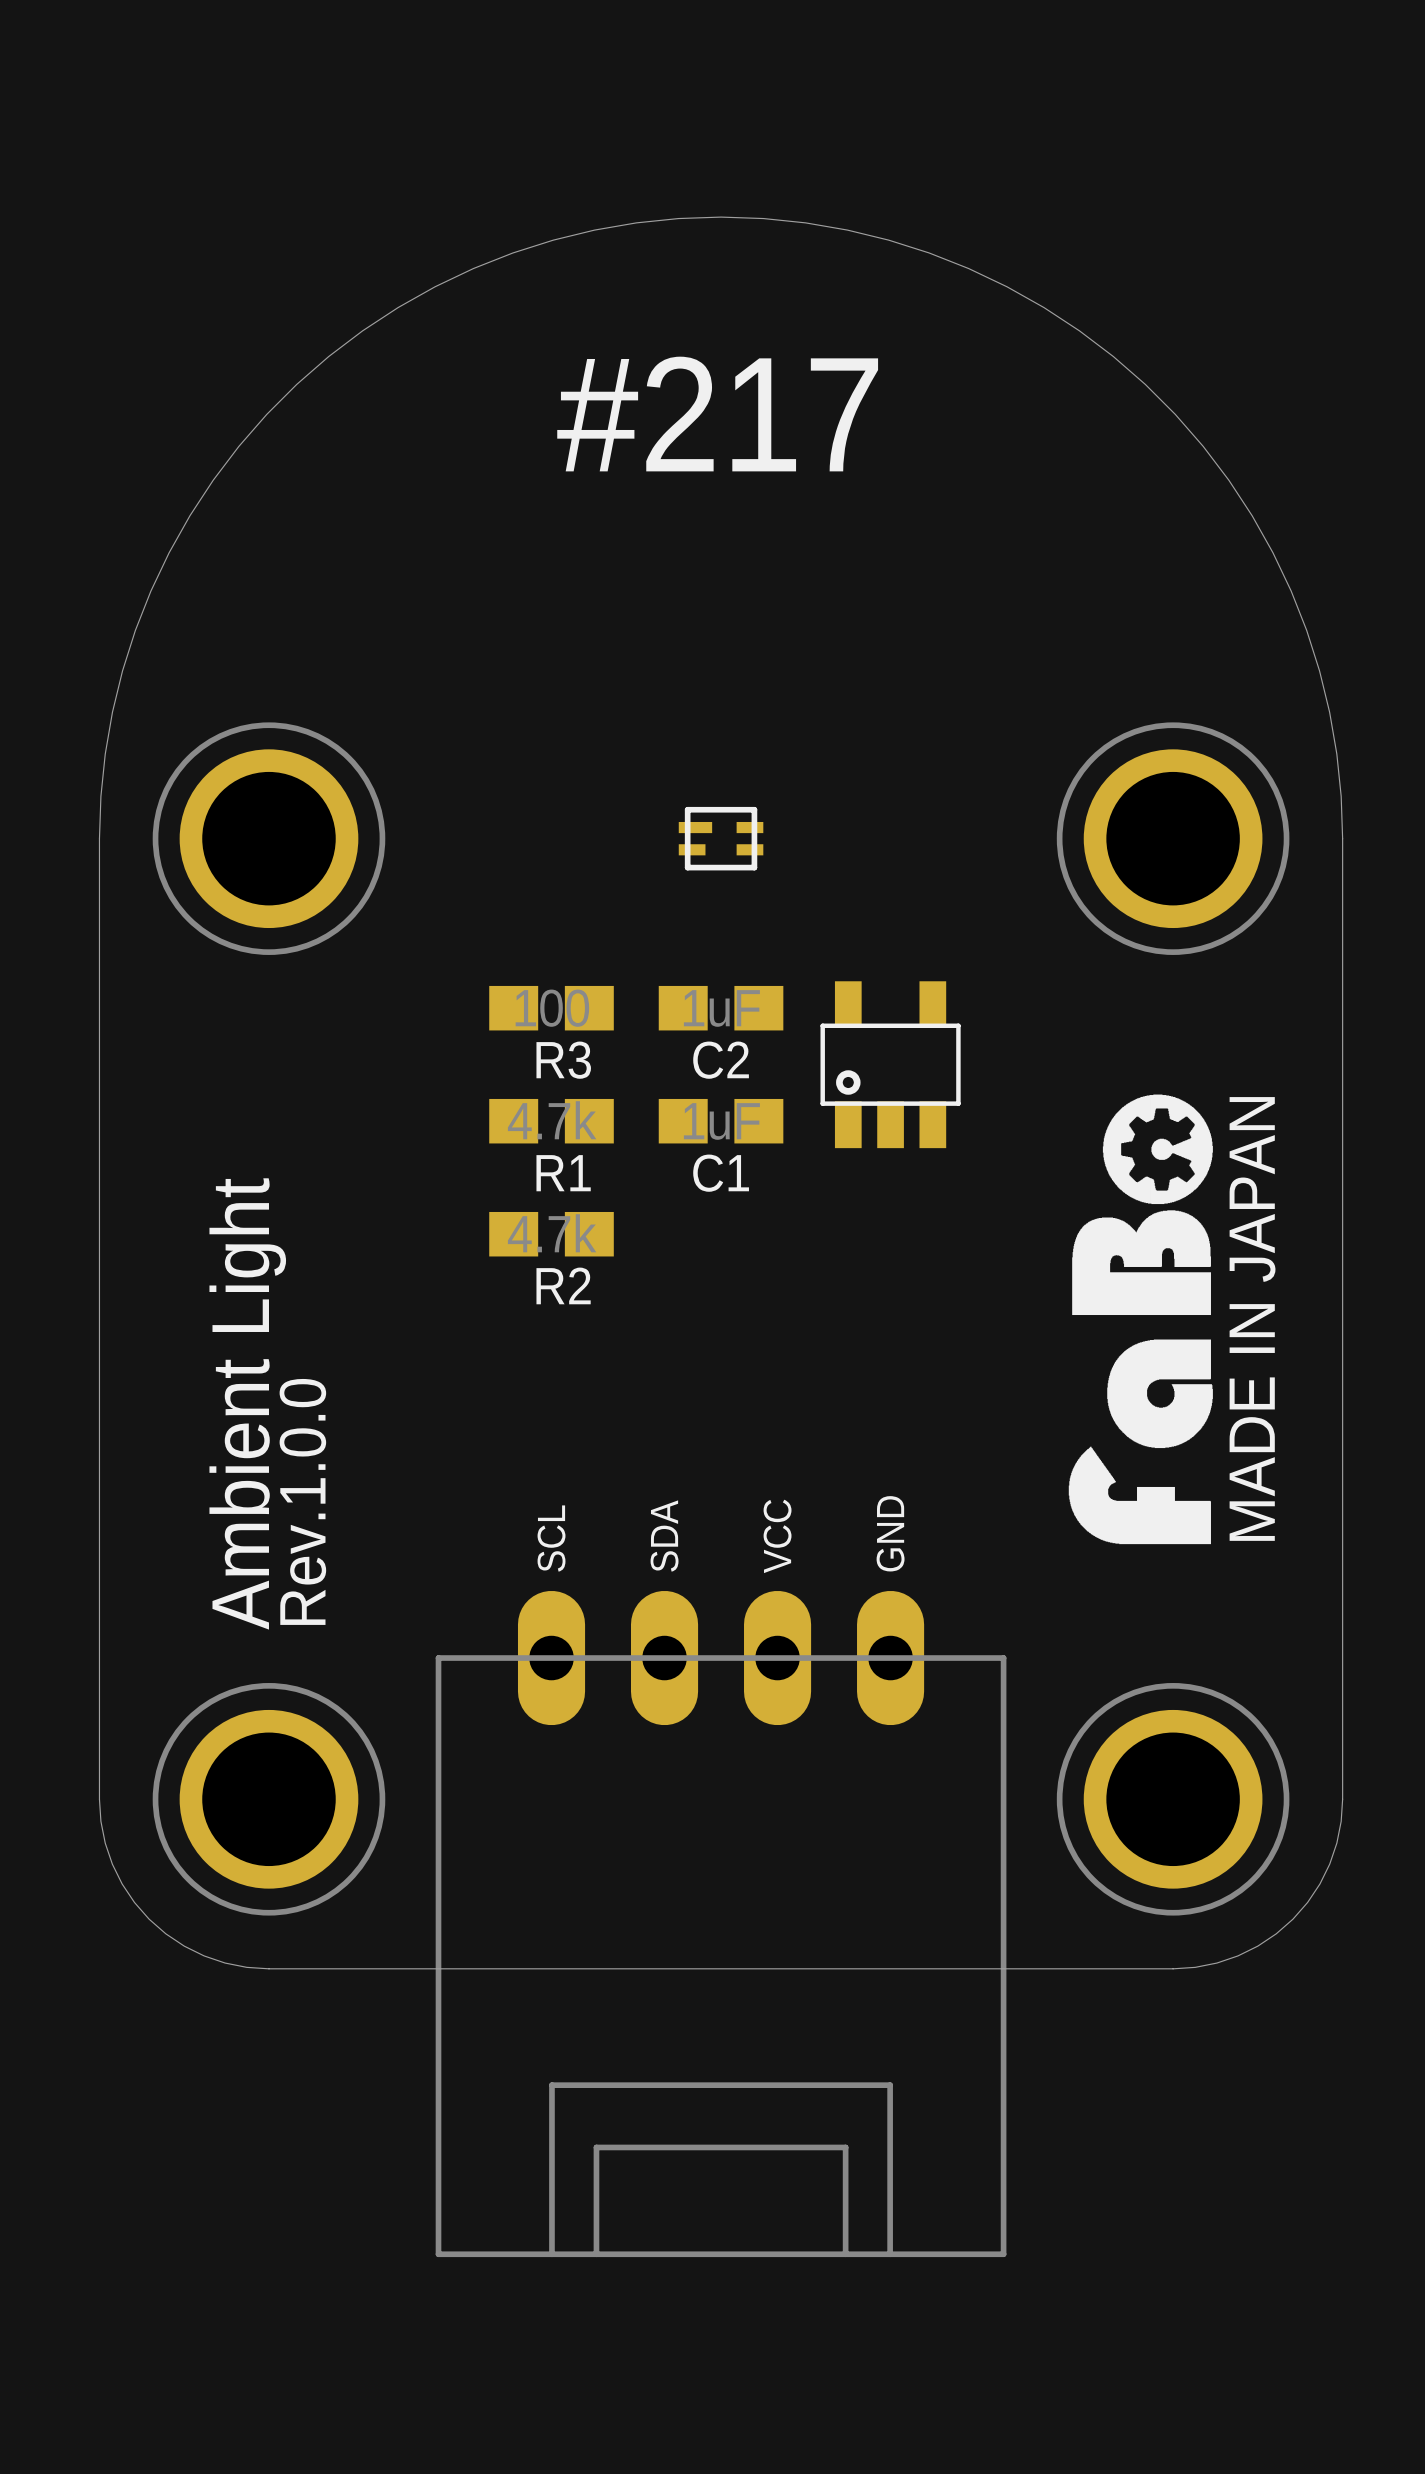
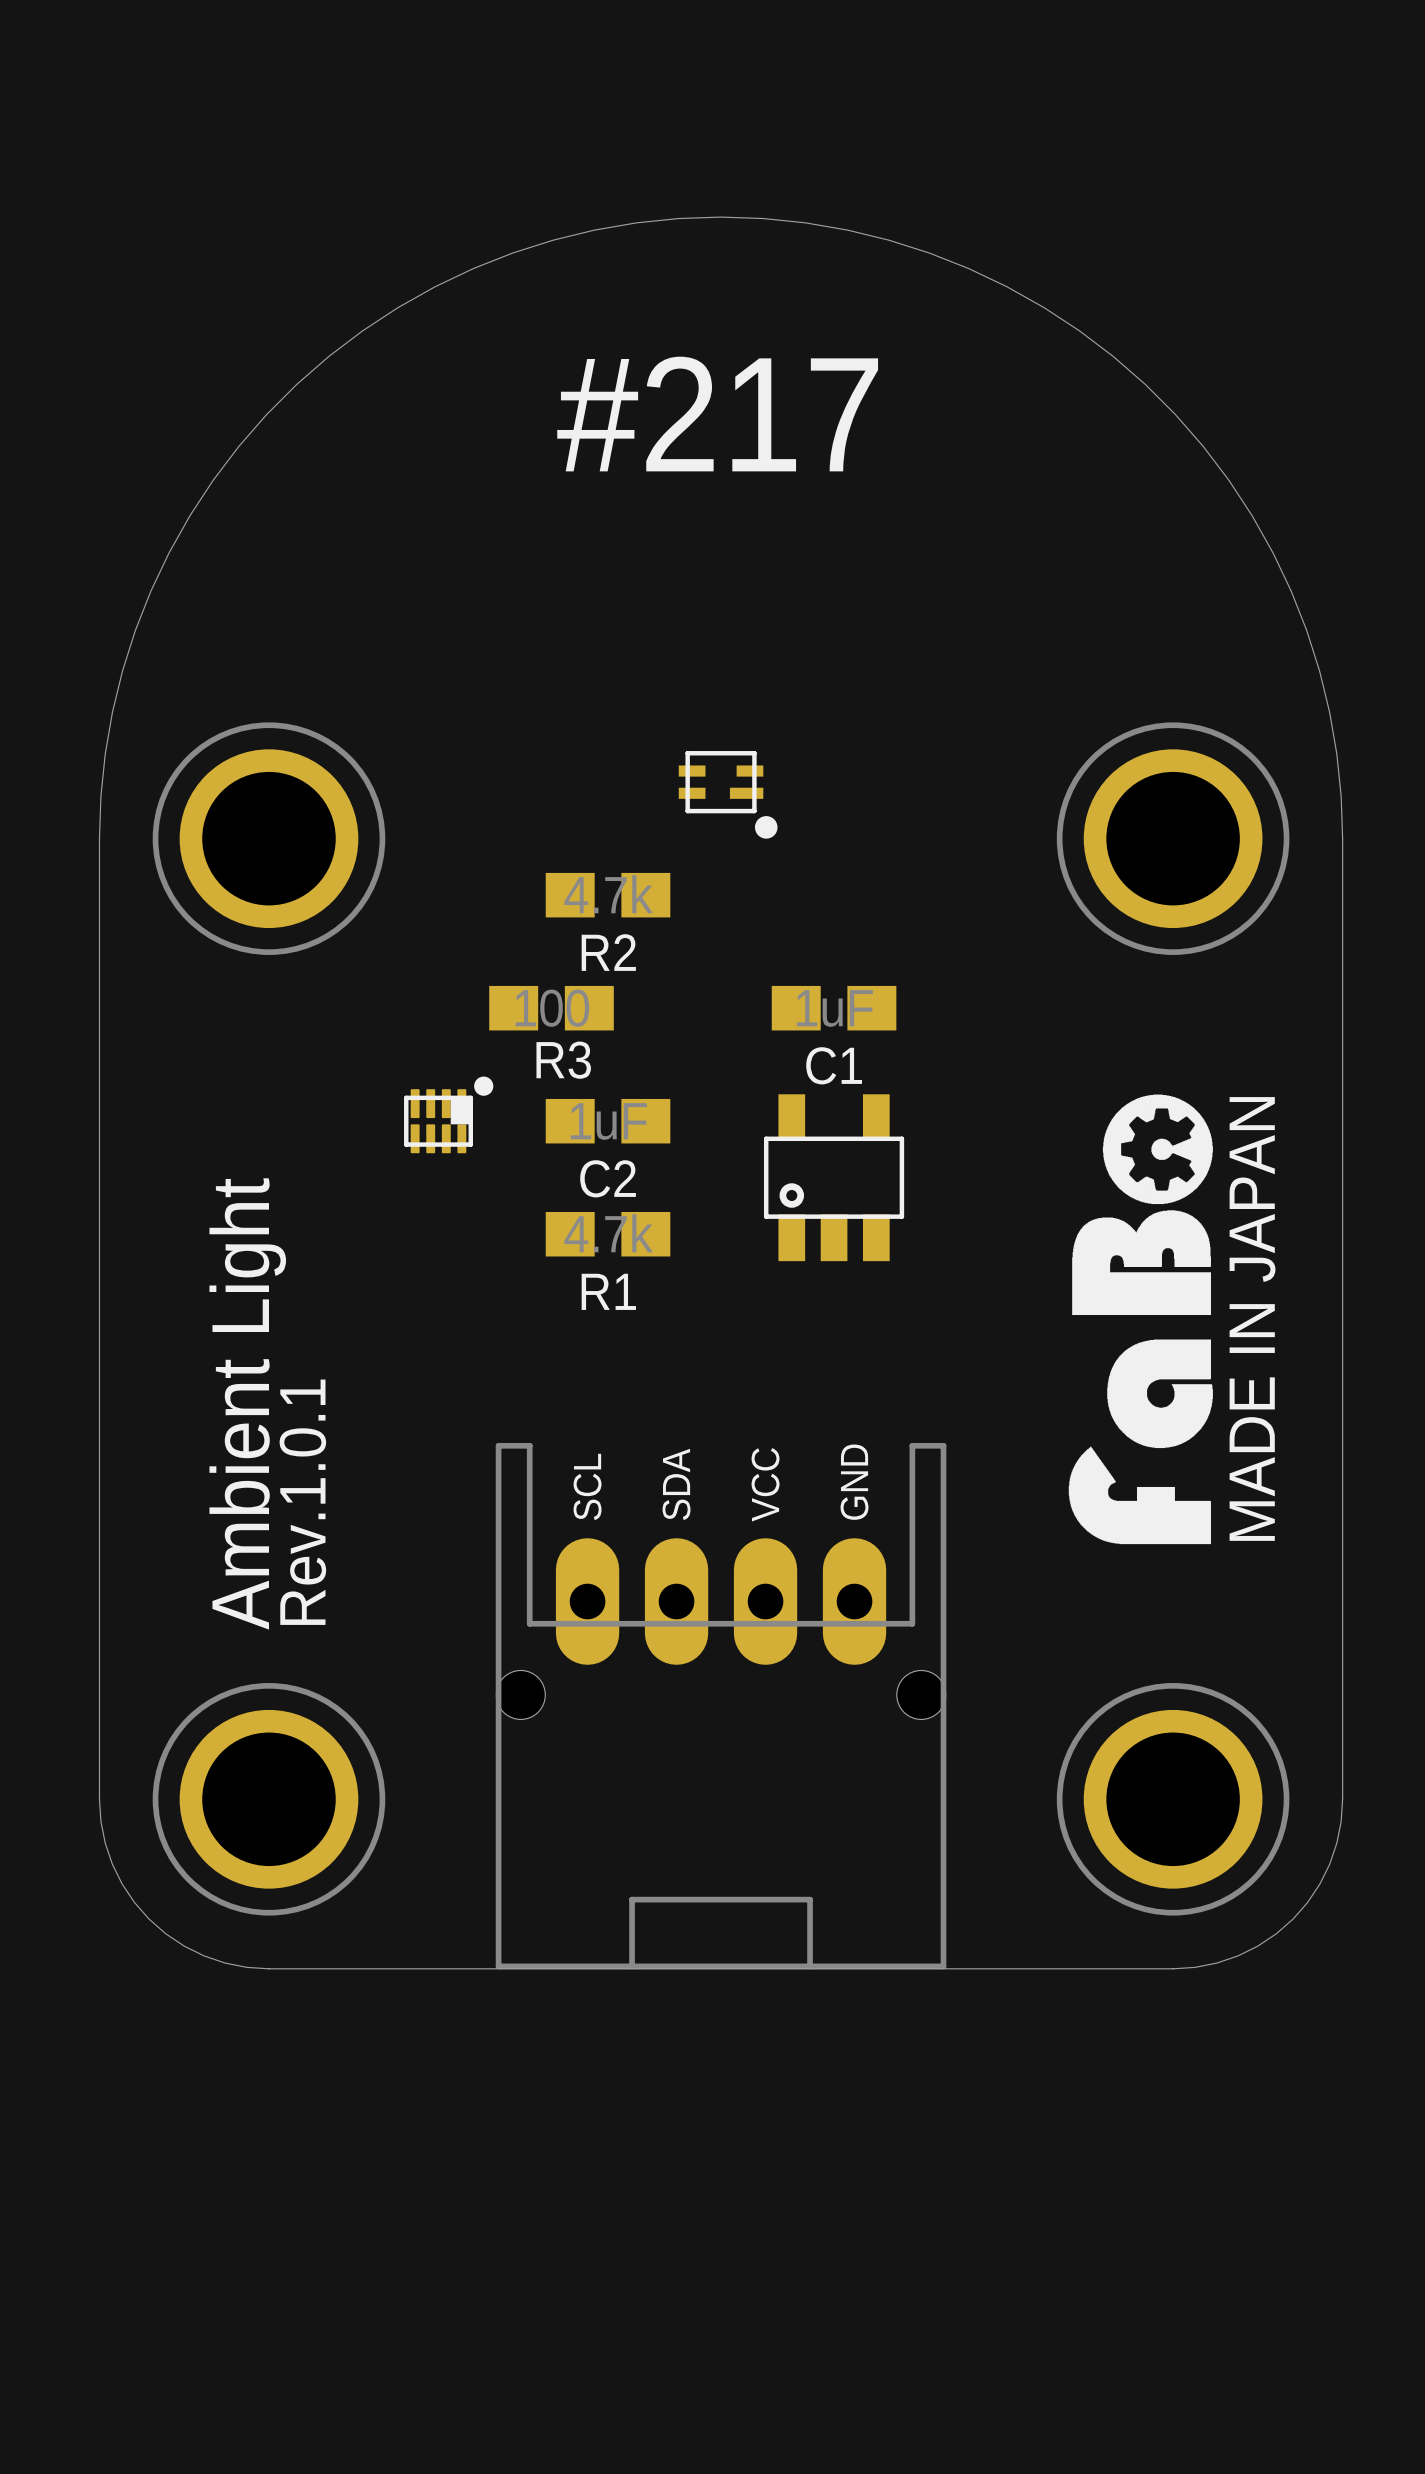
part footprint: [678, 806, 764, 871] -> [678, 751, 778, 839]
C2 position: (721, 1008) -> (608, 1121)
C2 name position: C2 (721, 1060) -> C2 (608, 1178)
part position: (890, 1064) -> (834, 1177)
part: none -> (721, 1093)
part: none -> (448, 1114)
R1 position: (551, 1121) -> (608, 1234)
C1 position: (721, 1121) -> (834, 1008)
R1 name position: R1 (563, 1173) -> R1 (608, 1291)
C1 name position: C1 (721, 1173) -> C1 (834, 1065)
R2 position: (551, 1234) -> (608, 895)
part: (721, 1237) -> none
R2 name position: R2 (563, 1285) -> R2 (608, 952)
text: Rev.1.0.0 (302, 1501) -> Rev.1.0.1 (302, 1502)

